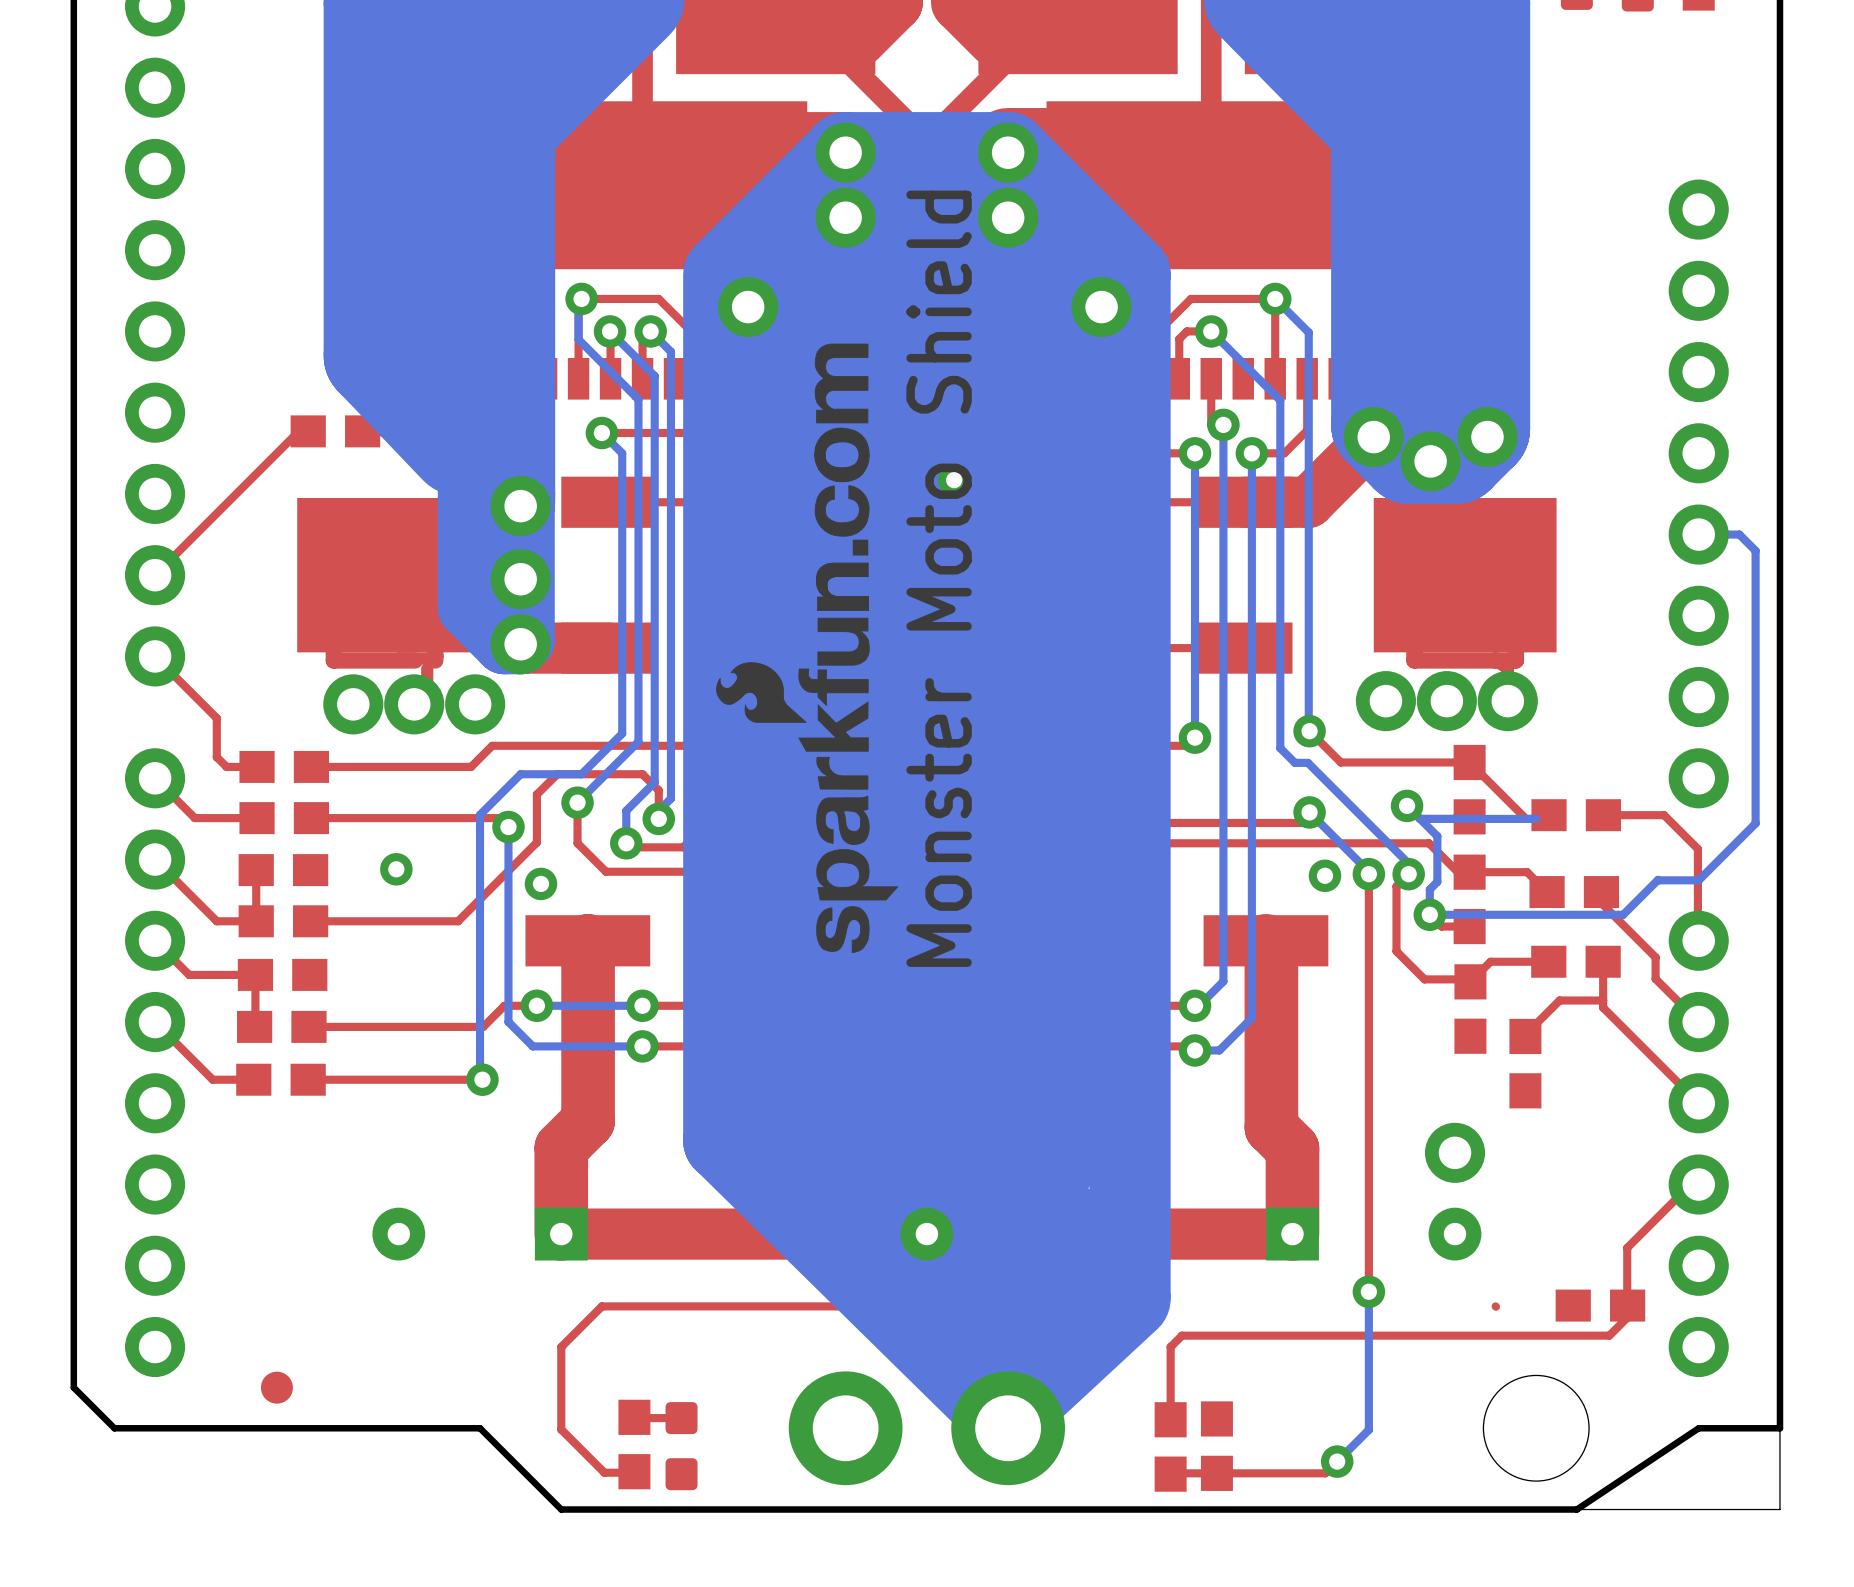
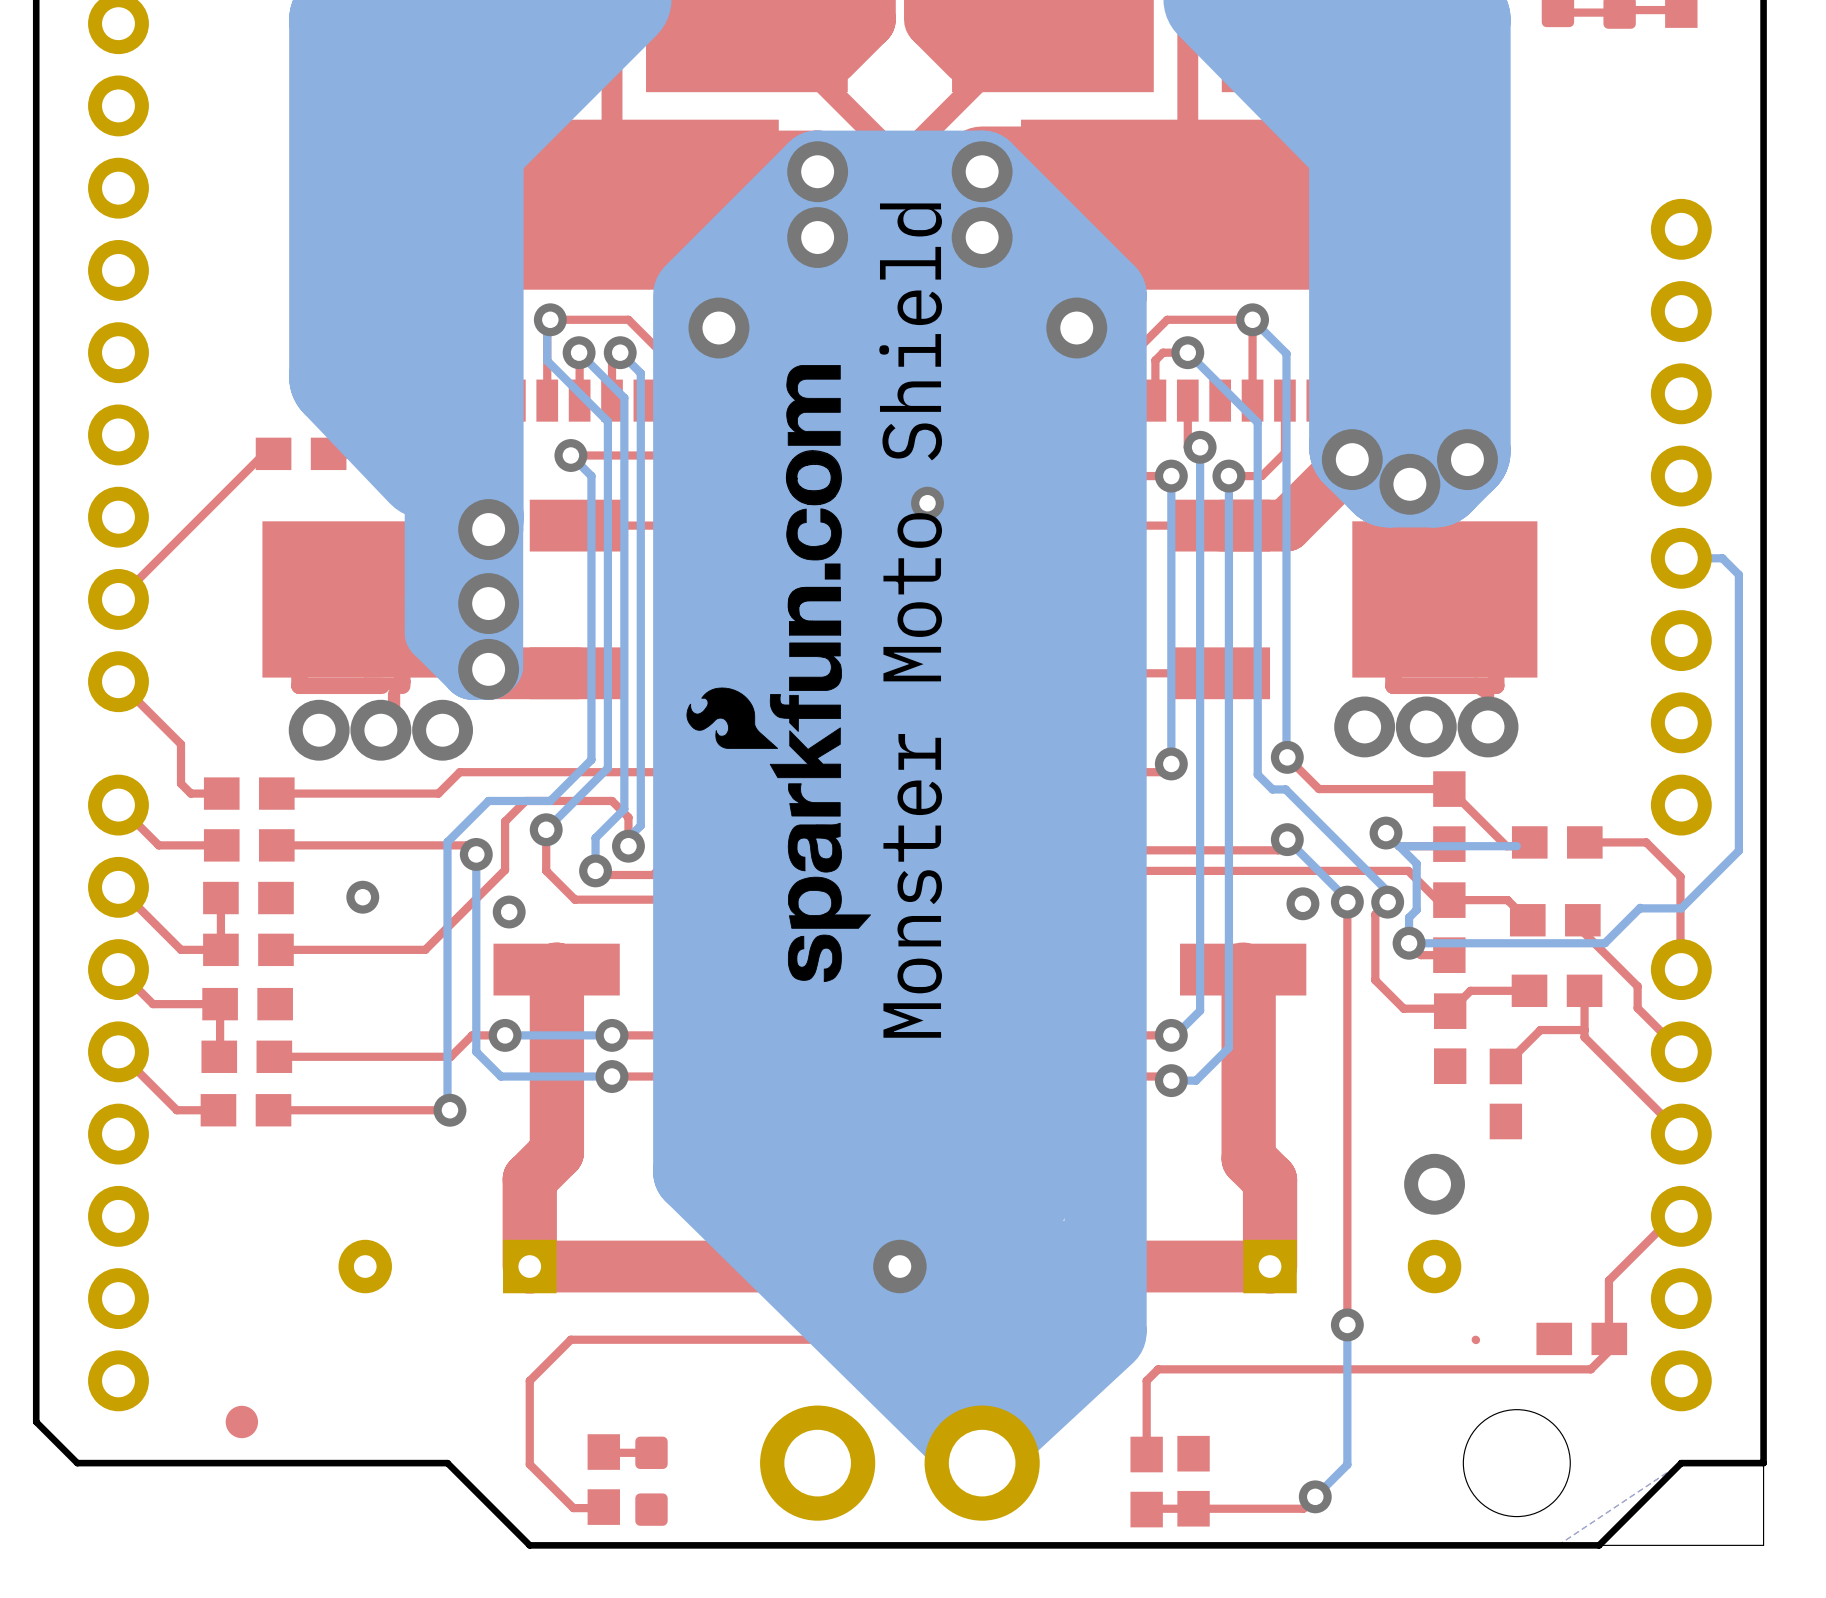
board edge: (1698, 1428) (1576, 1509) -> (1681, 1463) (1599, 1545)
board edge width: thin (1617, 1509) (1576, 1509) -> thick (1599, 1545) (1557, 1545)

